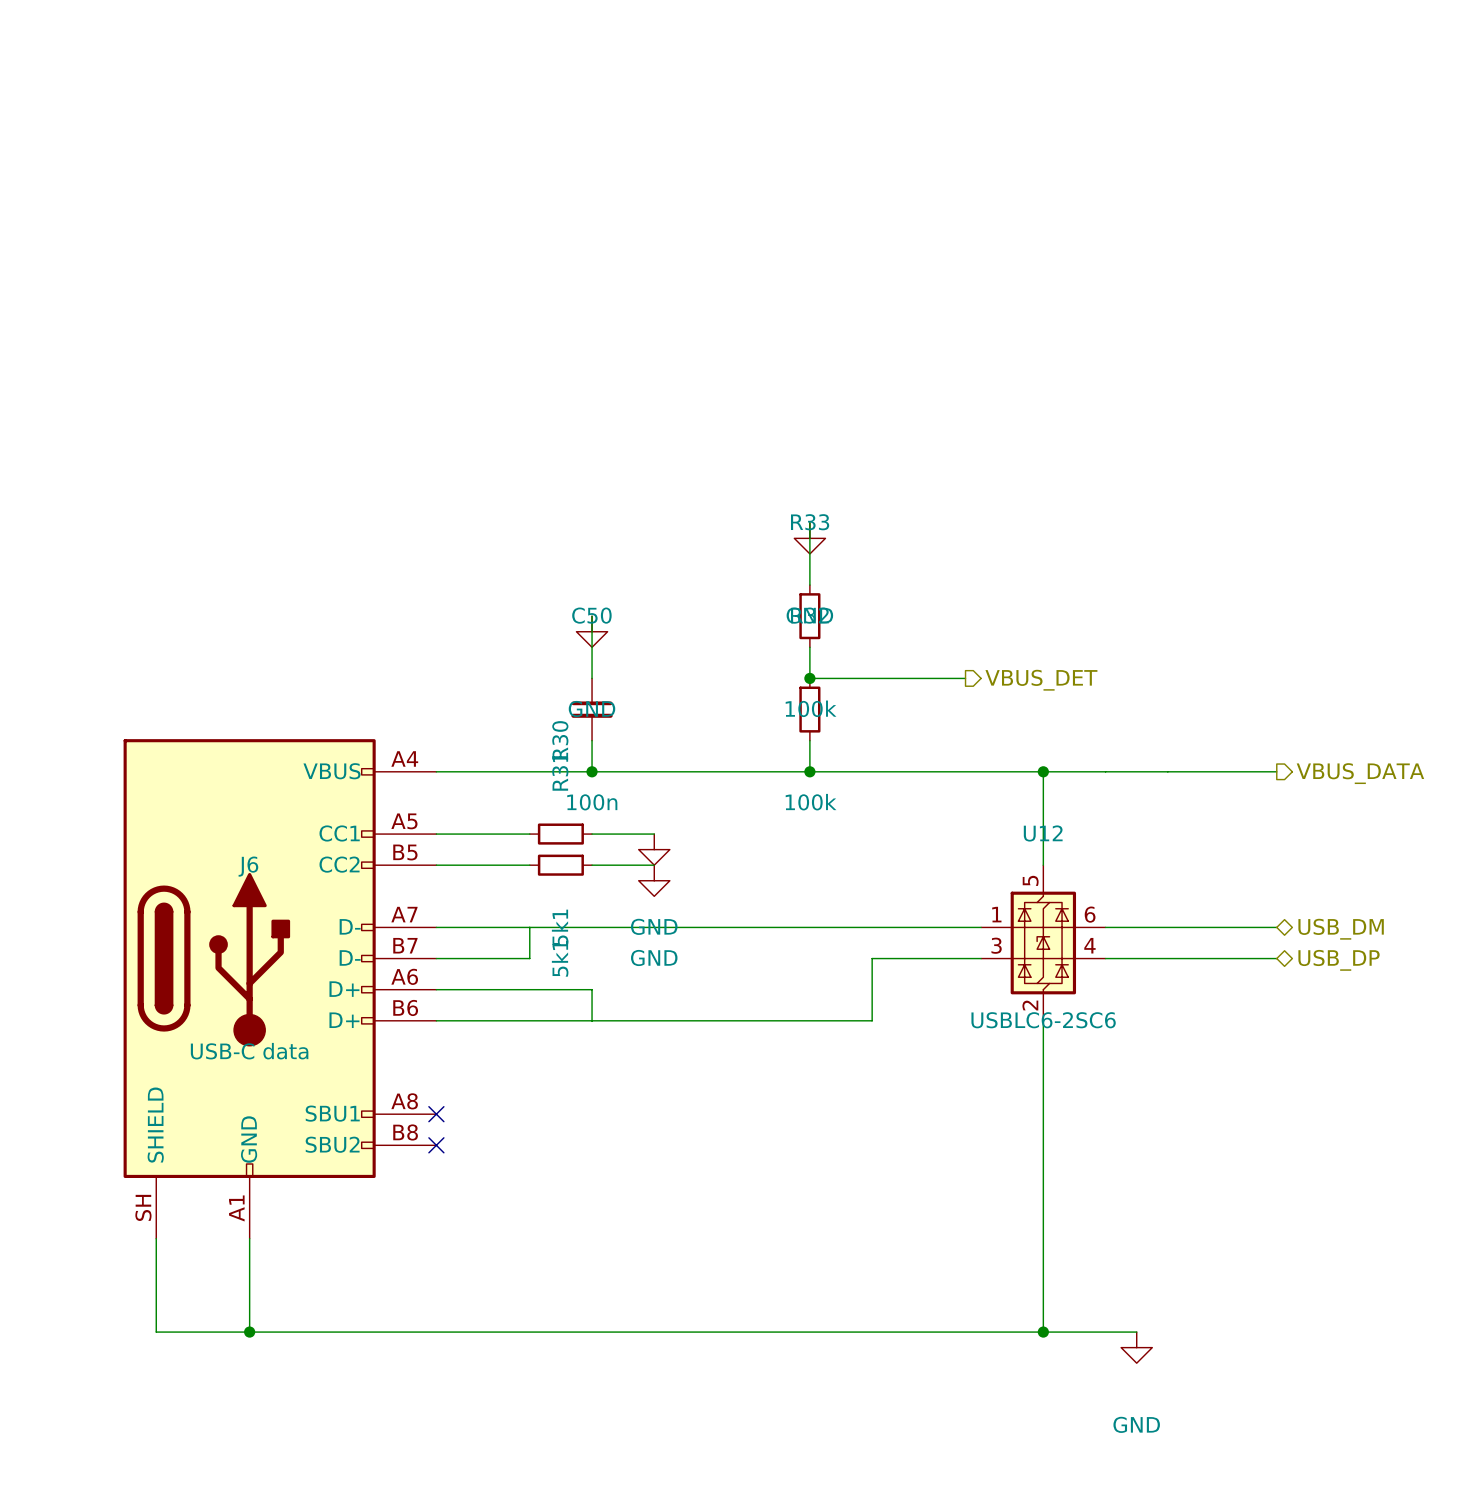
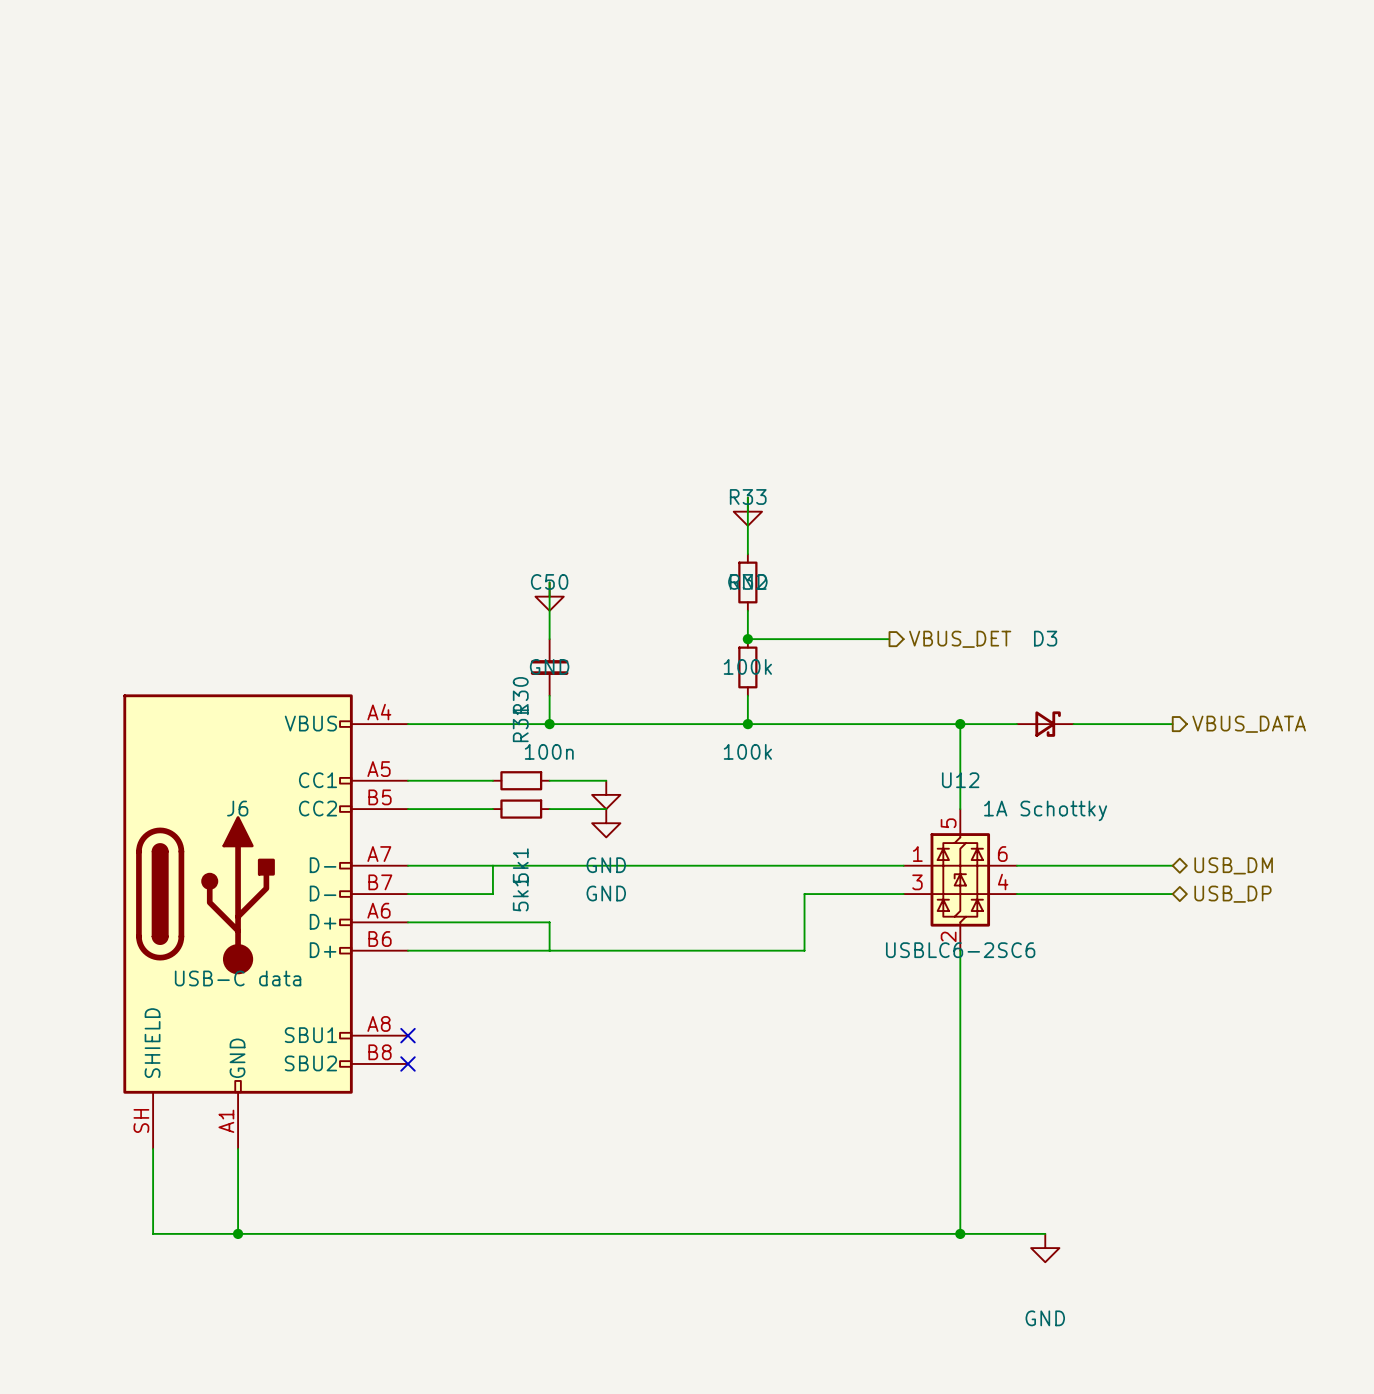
D3: none -> 1A Schottky (1045, 724)

